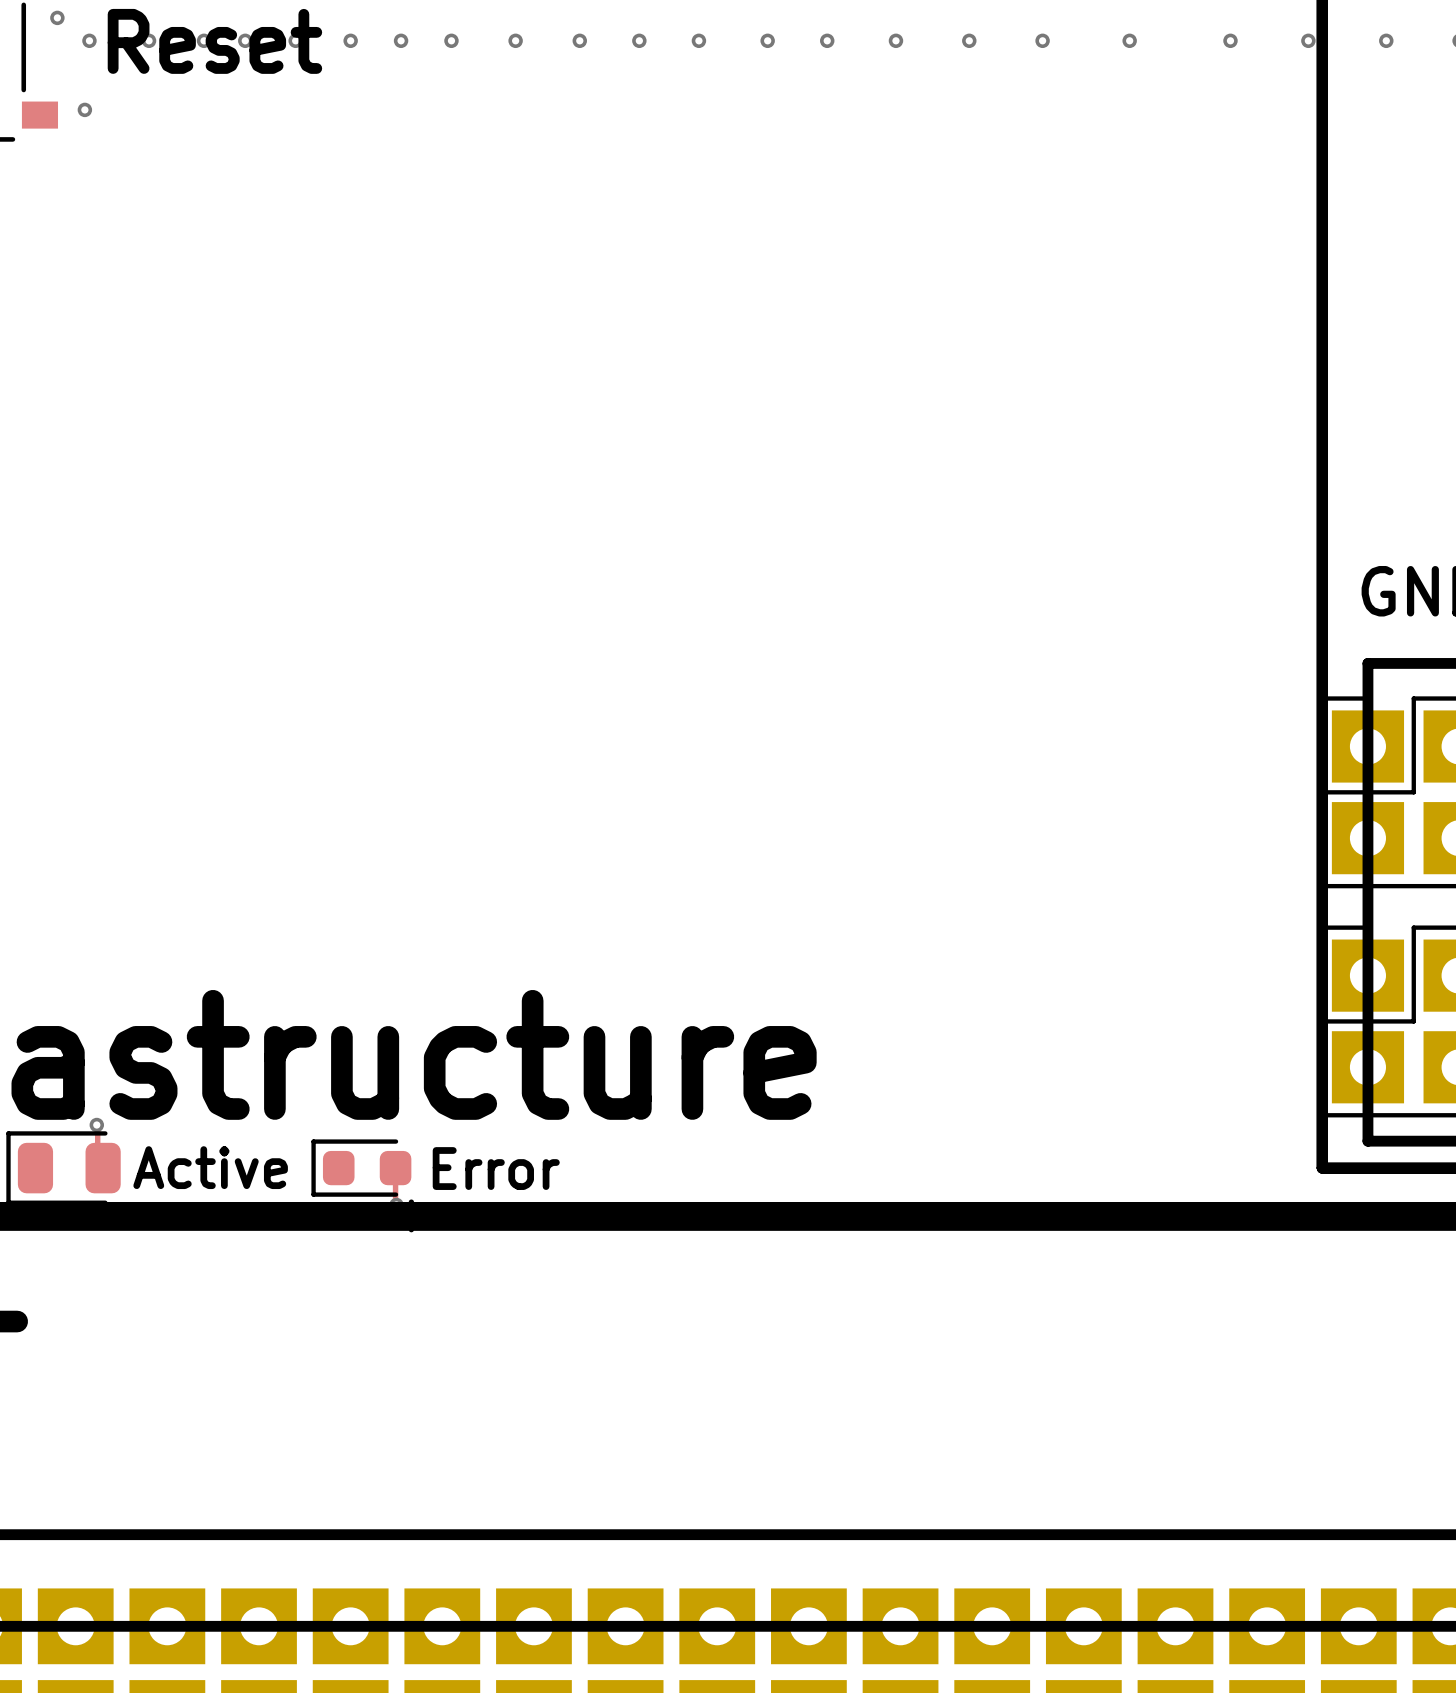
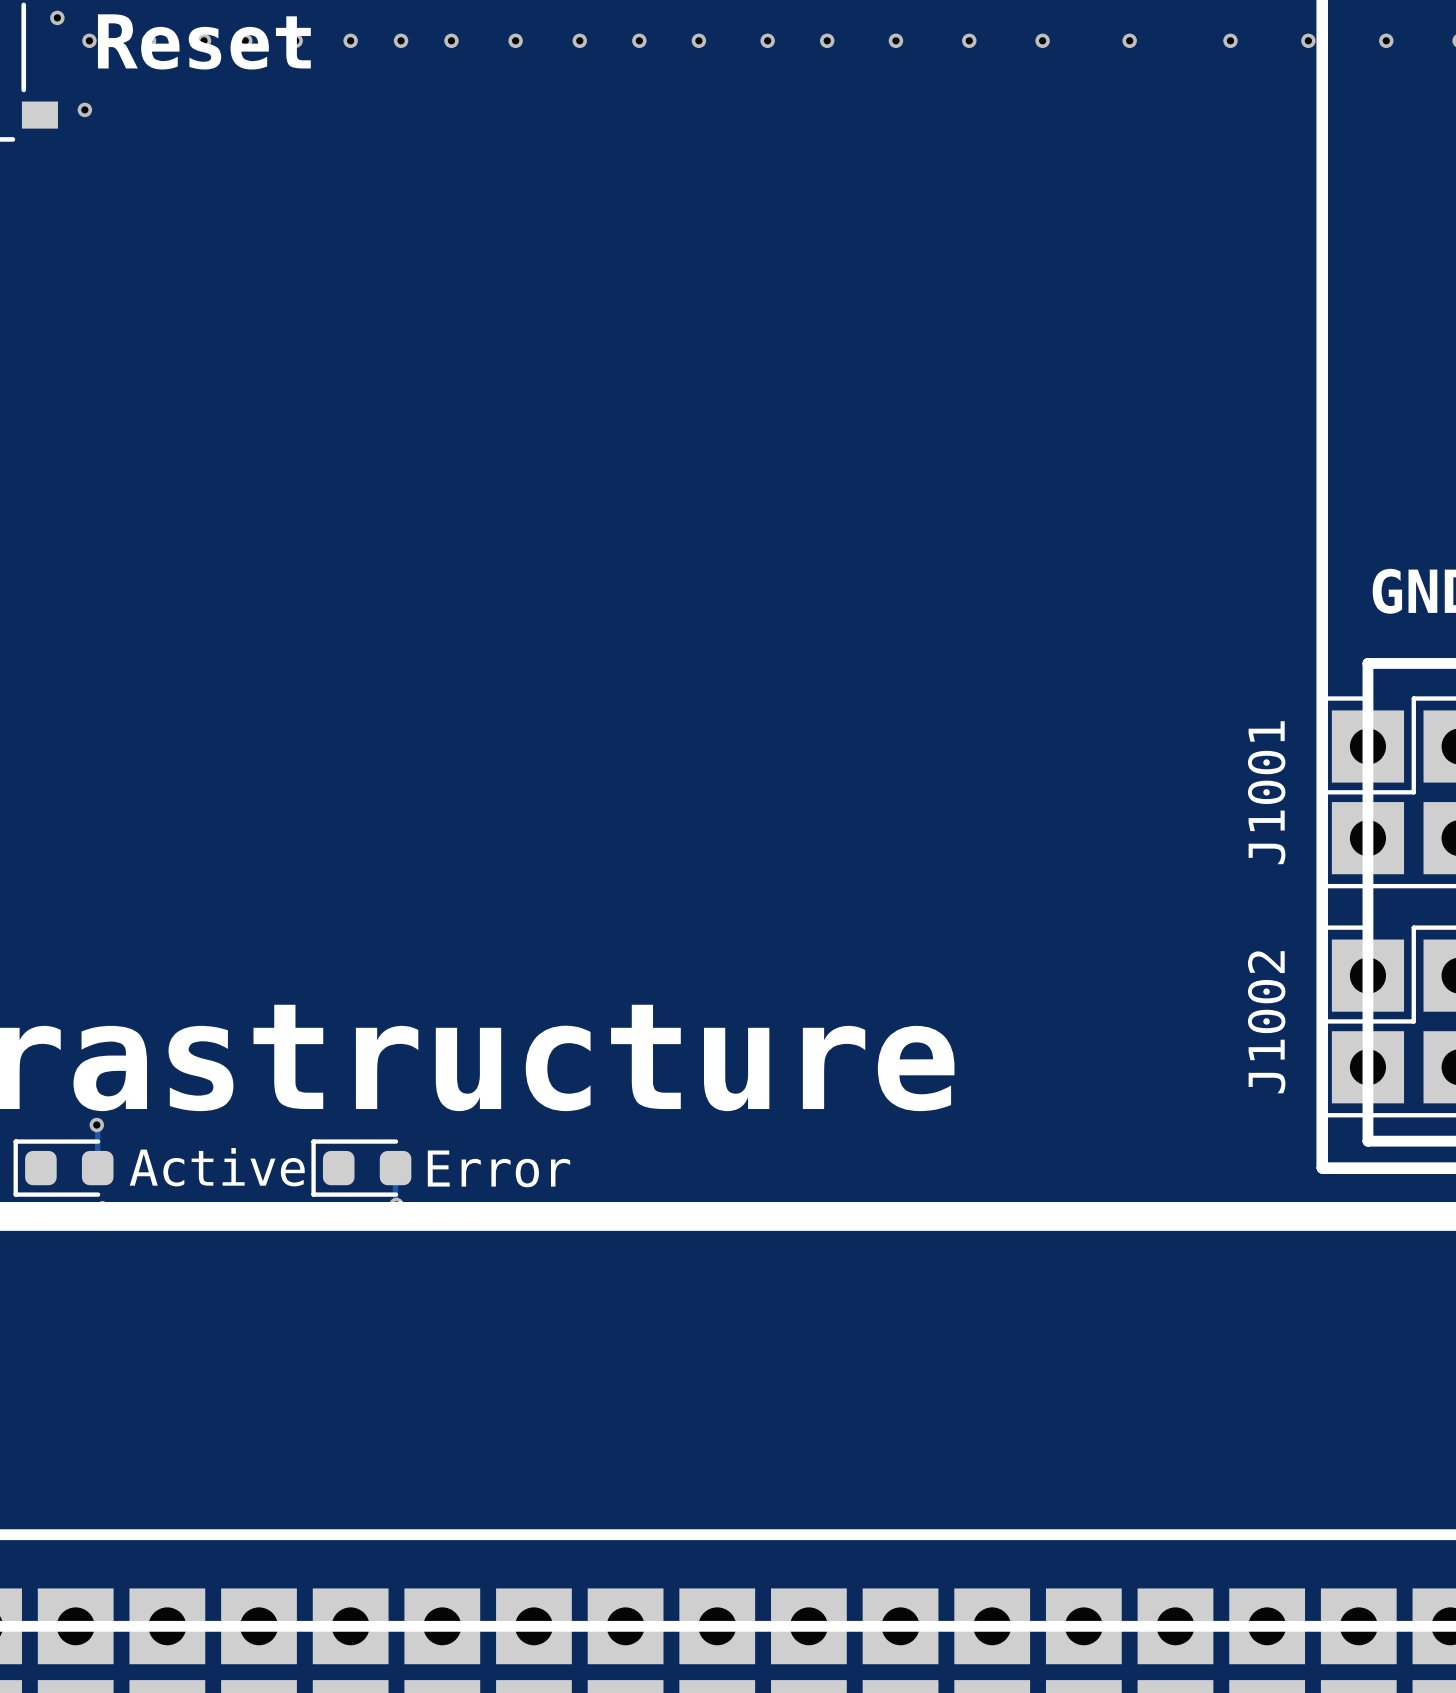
J1001 name: none -> J1001 (1266, 792)
J1002 name: none -> J1002 (1266, 1022)
part footprint: [6, 1131, 121, 1205] -> [13, 1139, 114, 1197]

